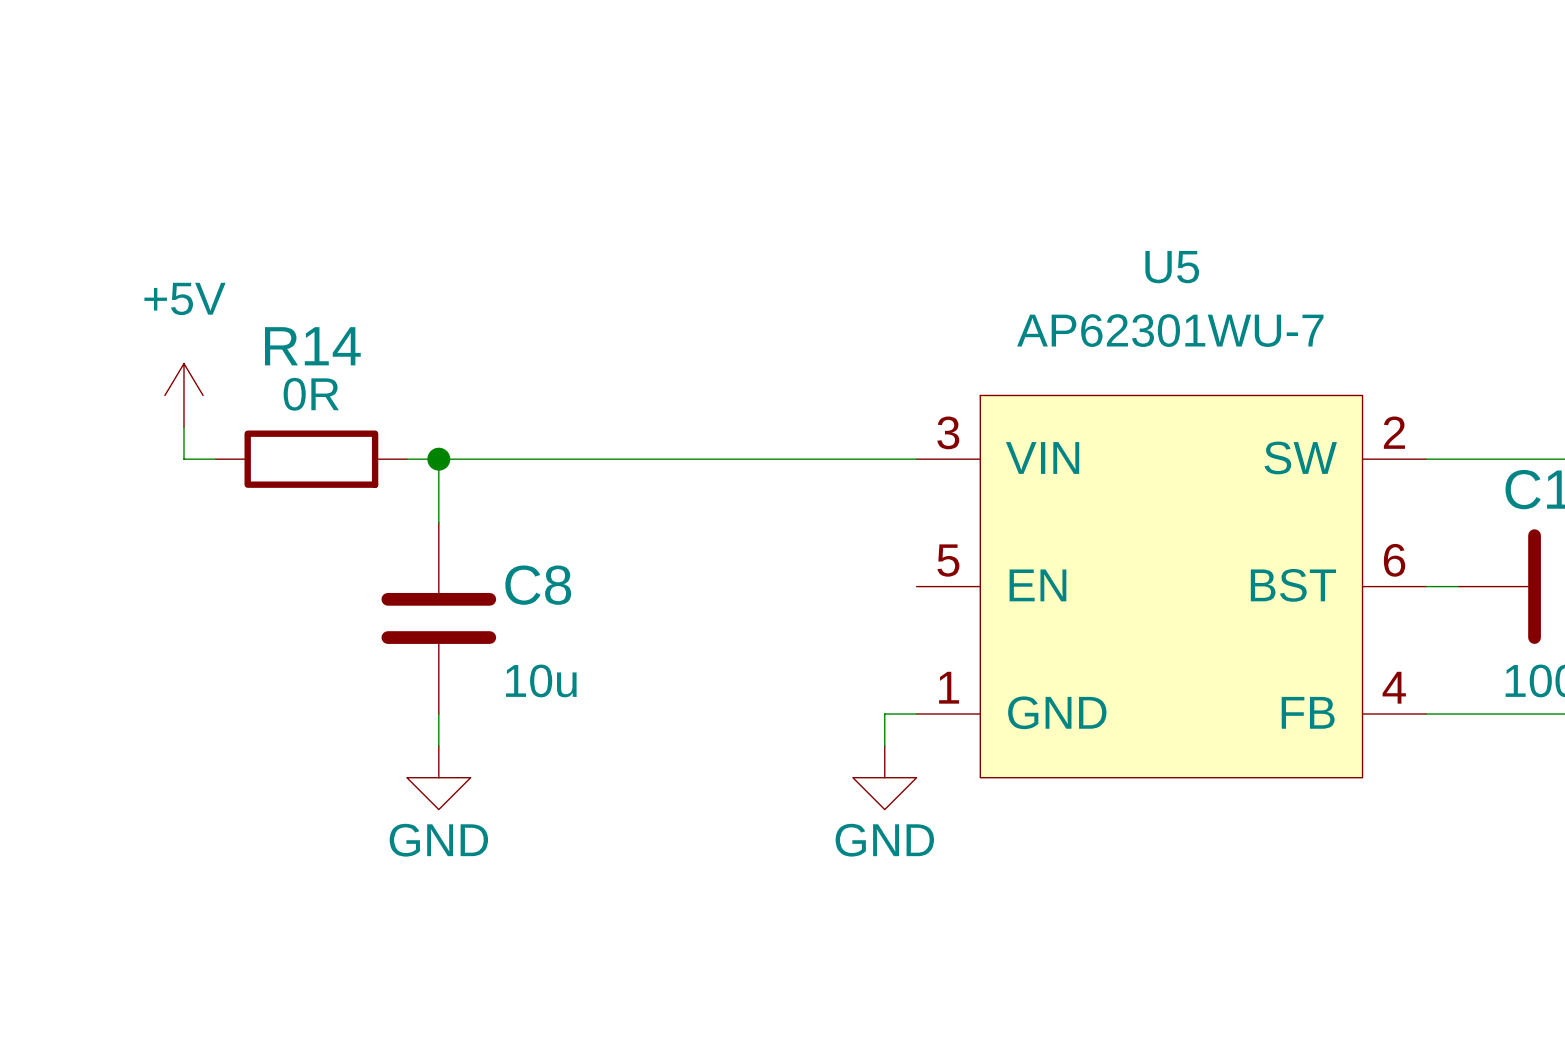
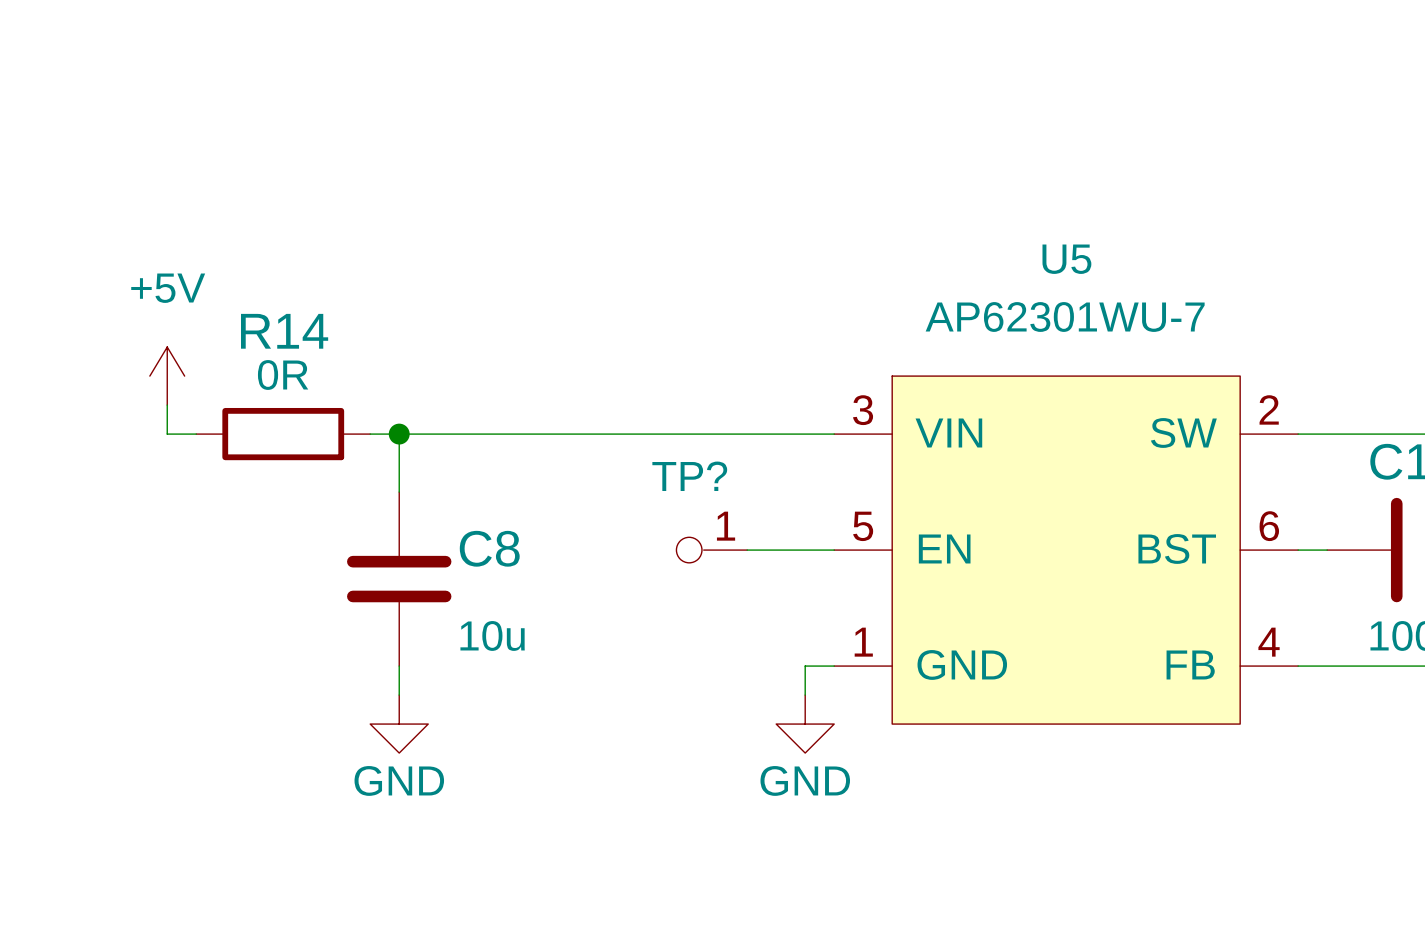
TP?: none -> (711, 550)
wire: none -> (747, 550) (834, 550)

